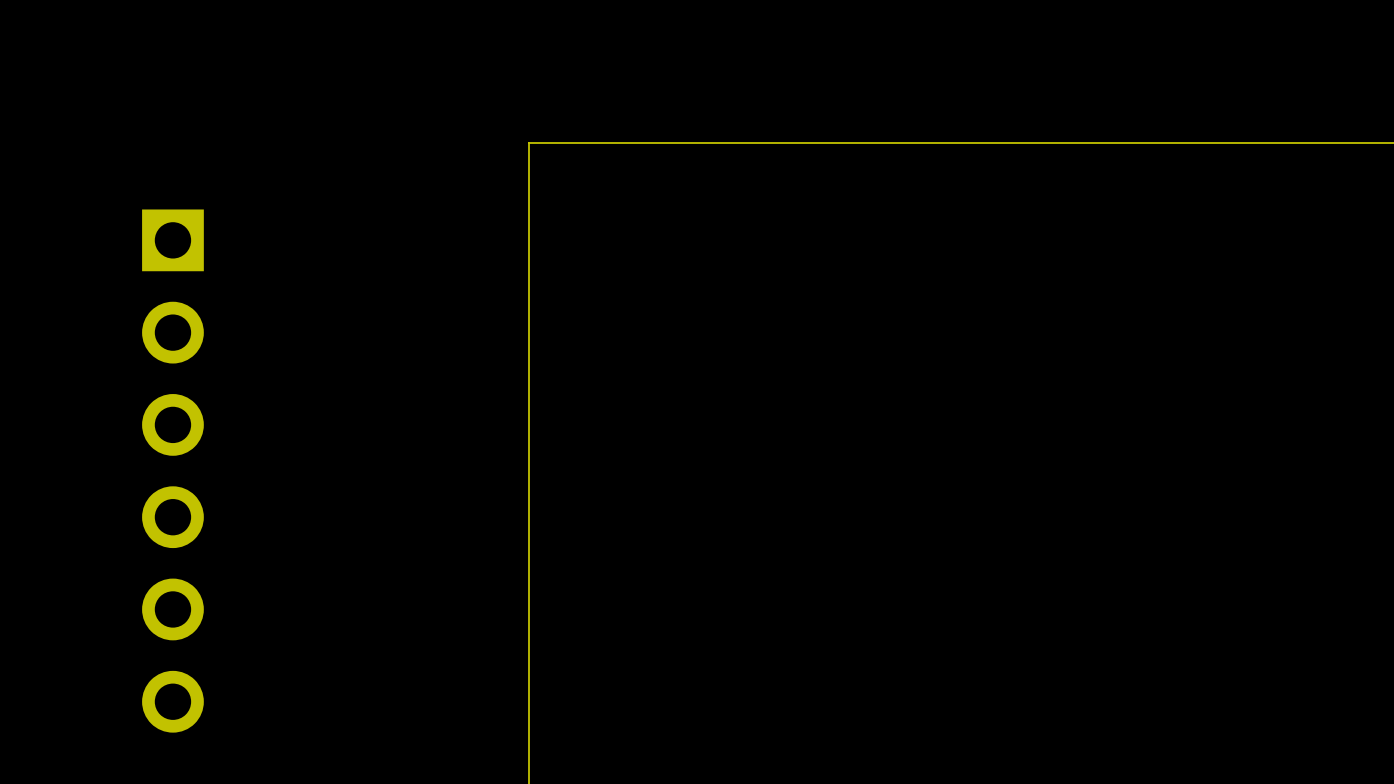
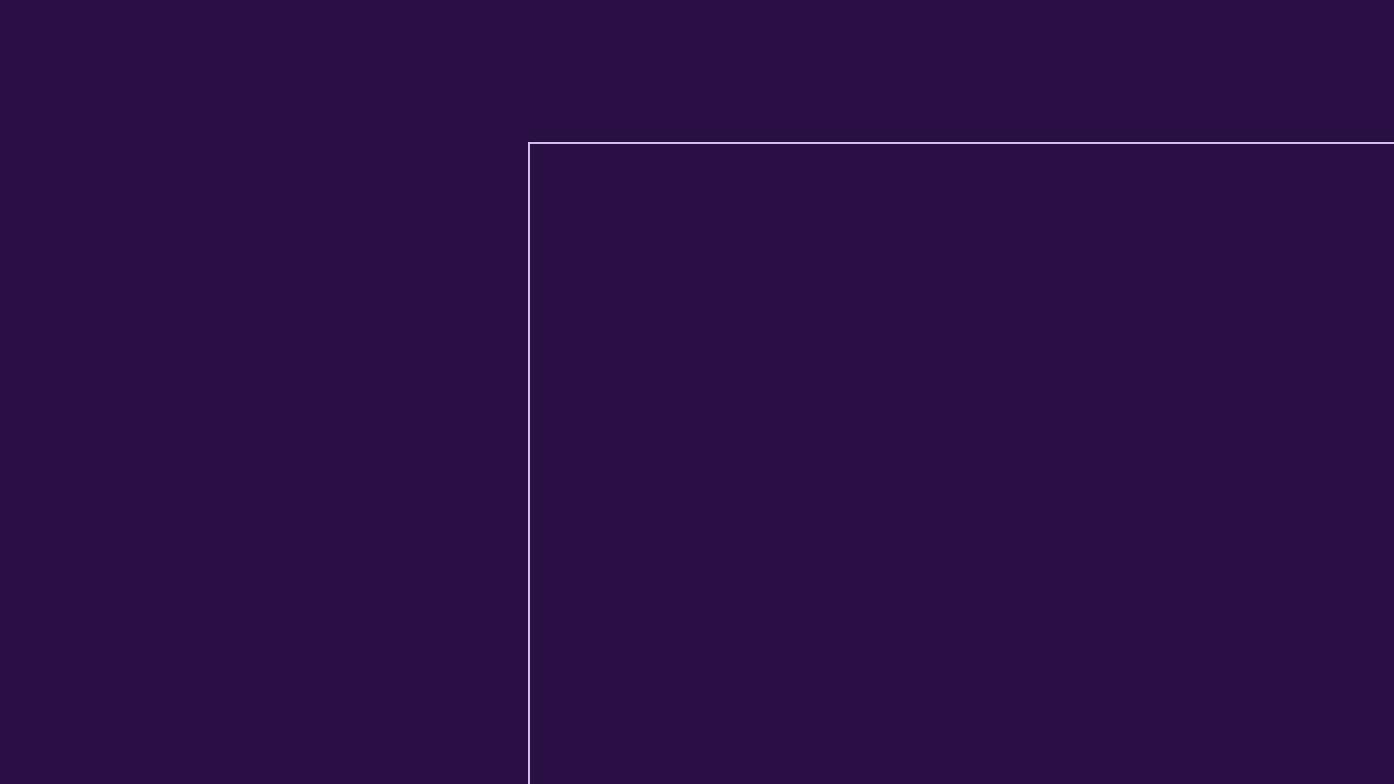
part: (172, 471) -> none

